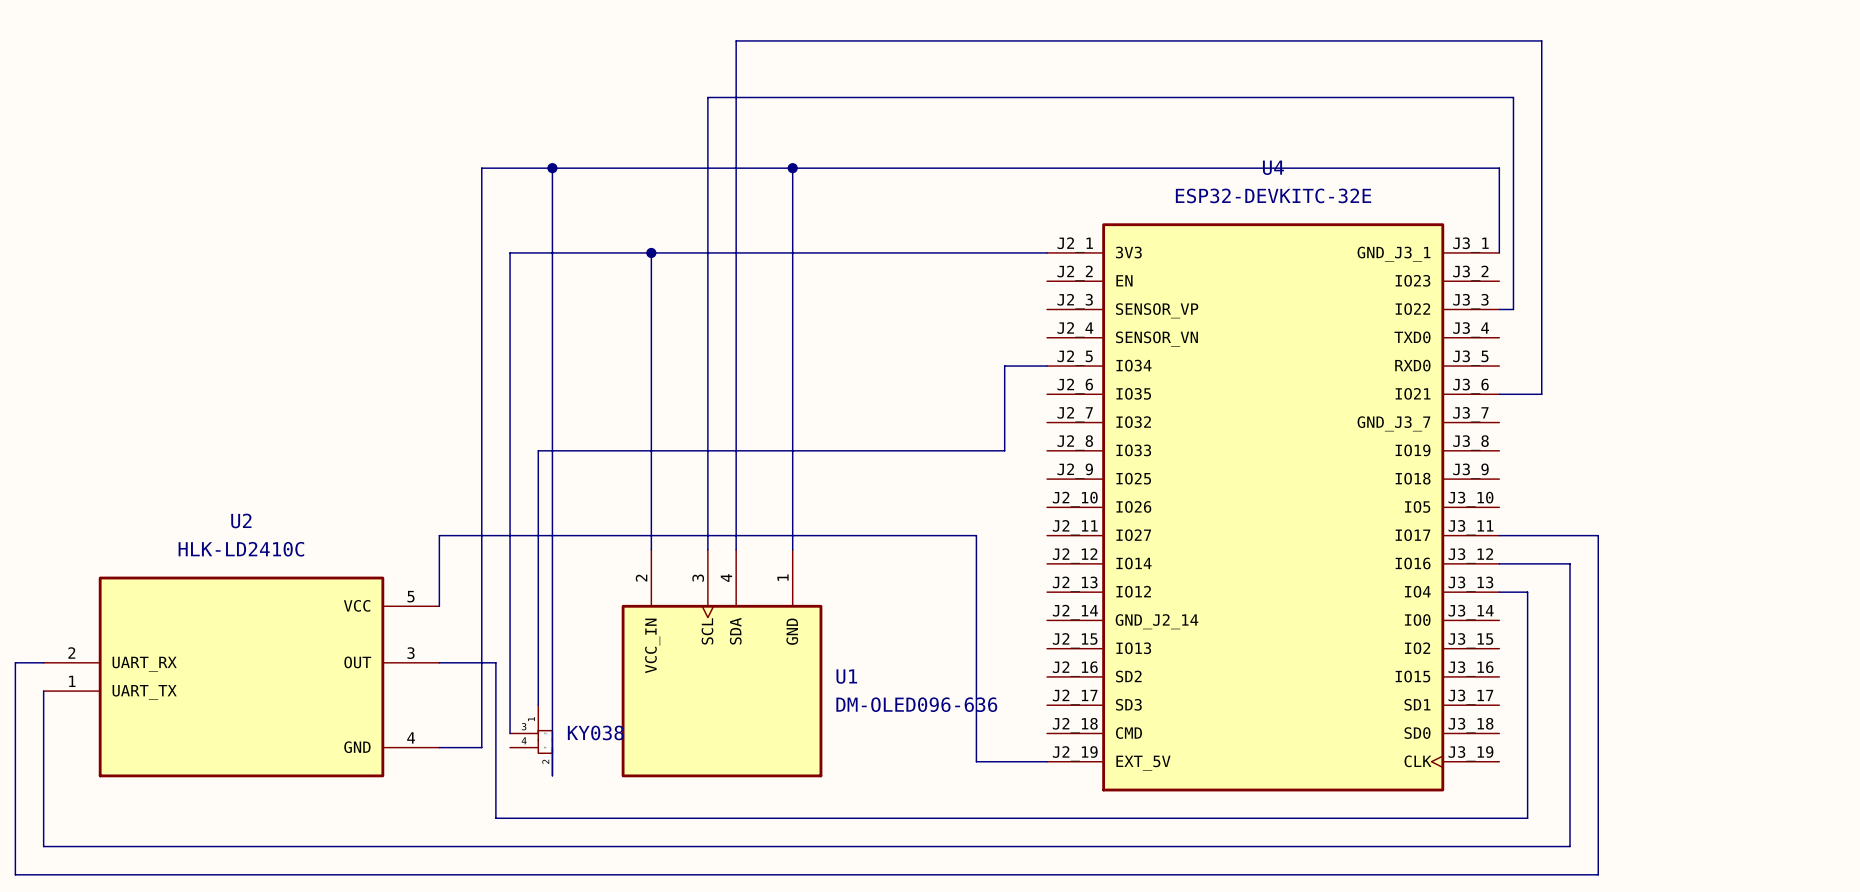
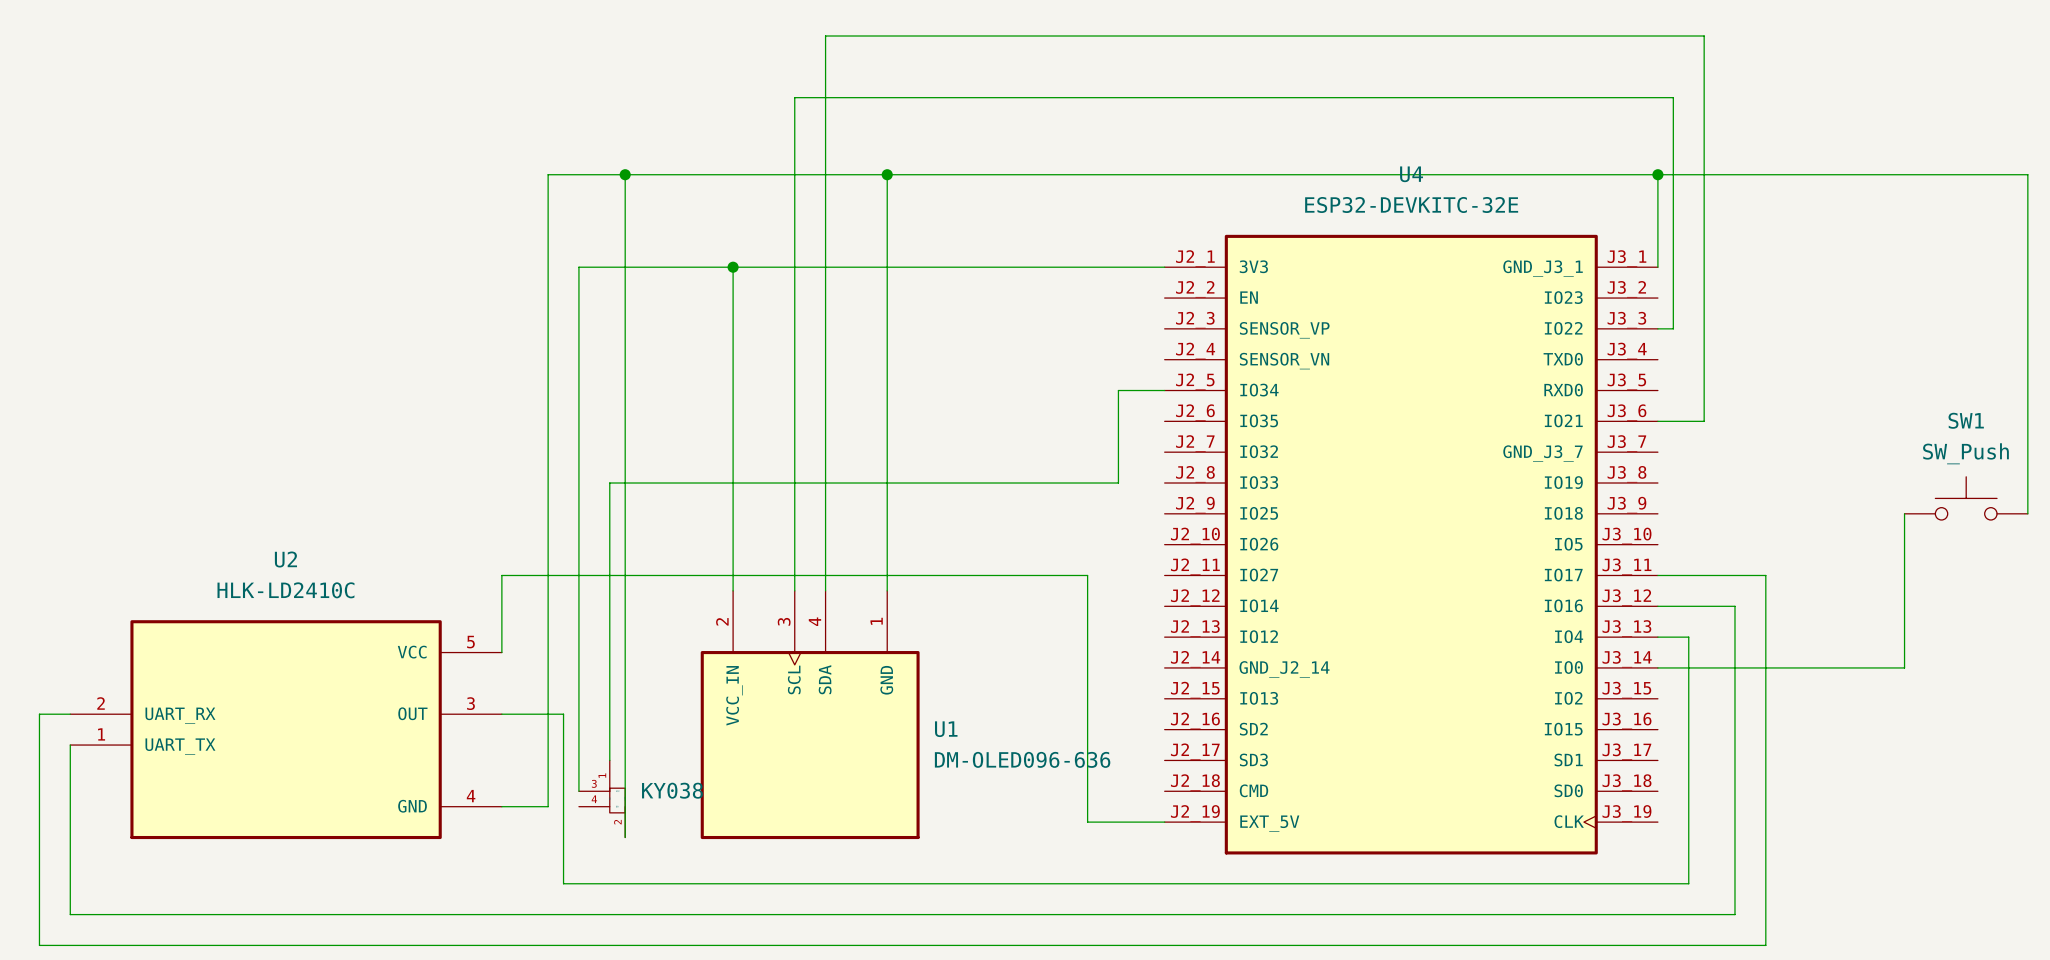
wire: none -> (1657, 174) (2027, 174) (2027, 513)
junction: none -> (1657, 174)
SW1: none -> SW_Push (1966, 498)
wire: none -> (1904, 513) (1904, 667) (1657, 667)

